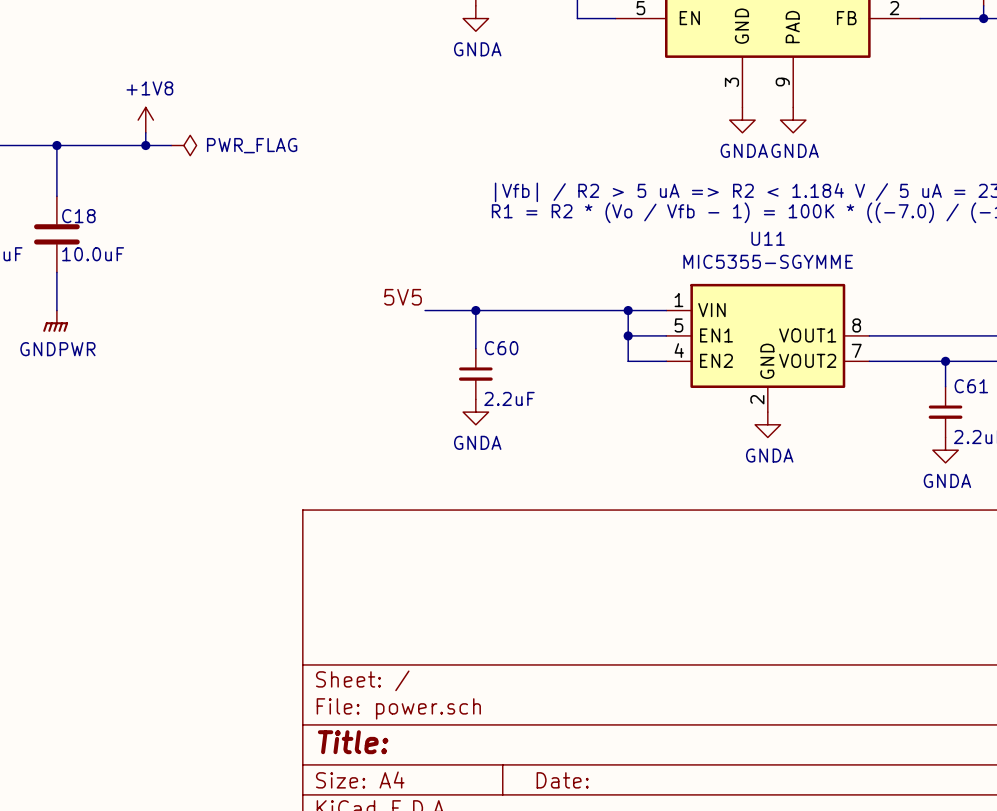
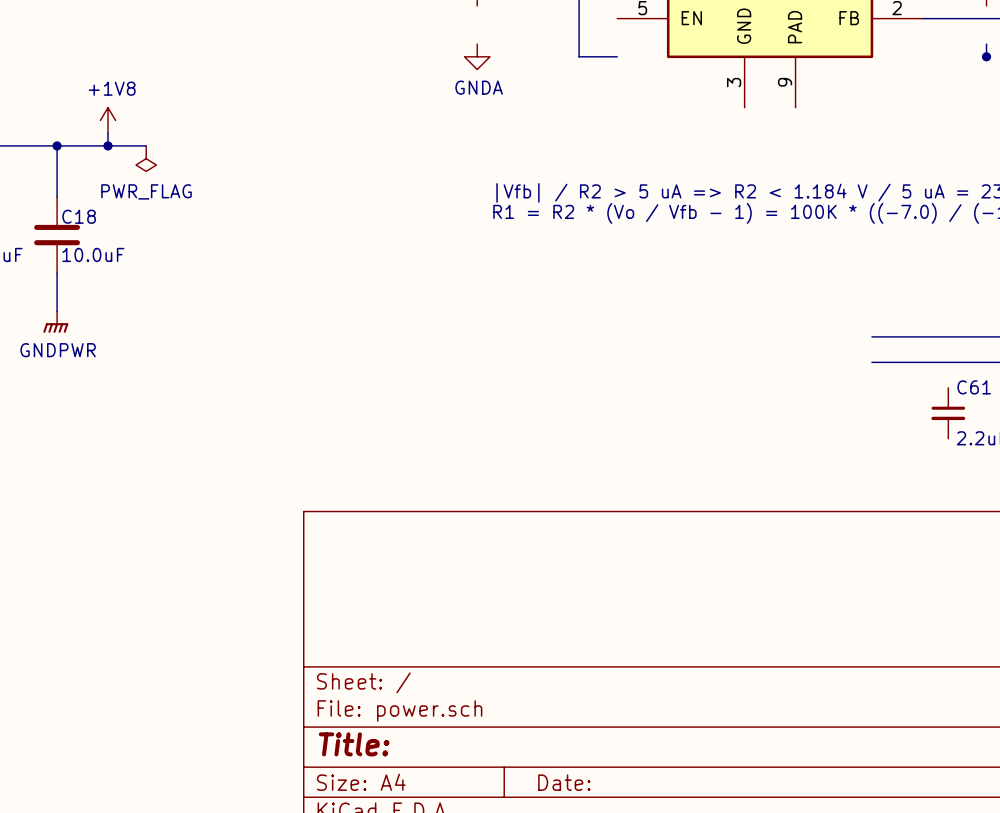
wire: (983, 5) (983, 18) -> (986, 44) (986, 56)
power symbol position: GNDA (475, 18) -> GNDA (477, 56)
wire: (577, 18) (615, 18) -> (579, 18) (579, 56) (617, 56)
junction: (983, 18) -> none
junction: none -> (986, 56)
power symbol position: +1V8 (145, 120) -> +1V8 (108, 120)
power symbol: GNDA (742, 120) -> none
power symbol: GNDA (793, 120) -> none
wire: none -> (108, 133) (108, 145)
wire: (145, 132) (145, 145) (171, 145) -> none
junction position: (145, 145) -> (108, 145)
power symbol rotation: 0° (183, 145) -> 90° clockwise (146, 158)
power symbol position: PWR_FLAG (183, 145) -> PWR_FLAG (146, 158)
power symbol text position: PWR_FLAG (252, 145) -> PWR_FLAG (146, 191)
label: 5V5 (403, 297) -> none
wire: (425, 310) (666, 310) -> none
wire: (475, 310) (475, 348) -> none
junction: (475, 310) -> none
wire: (628, 310) (628, 361) (666, 361) -> none
junction: (628, 310) -> none
wire: (628, 335) (666, 335) -> none
junction: (628, 335) -> none
U11: MIC5355-SGYMME (767, 347) -> none
wire: (945, 361) (945, 386) -> none
junction: (945, 361) -> none
C60: 2.2uF (475, 374) -> none
power symbol: GNDA (475, 412) -> none
power symbol: GNDA (767, 424) -> none
power symbol: GNDA (945, 450) -> none

